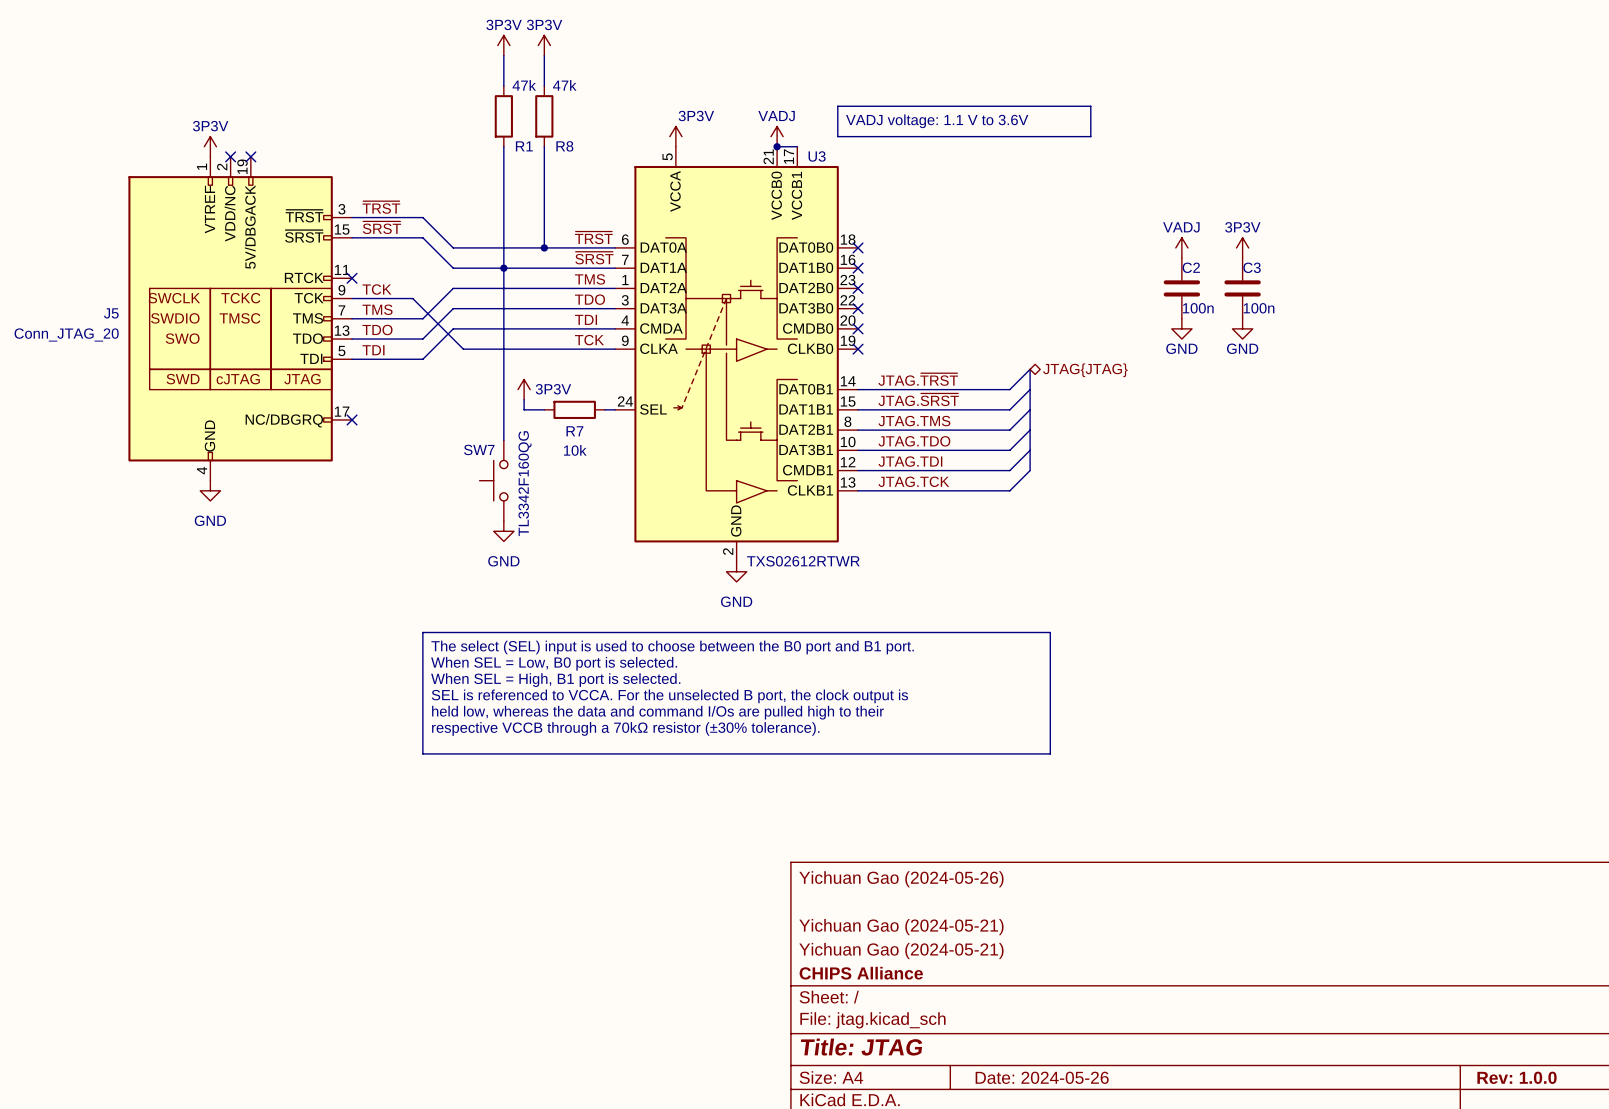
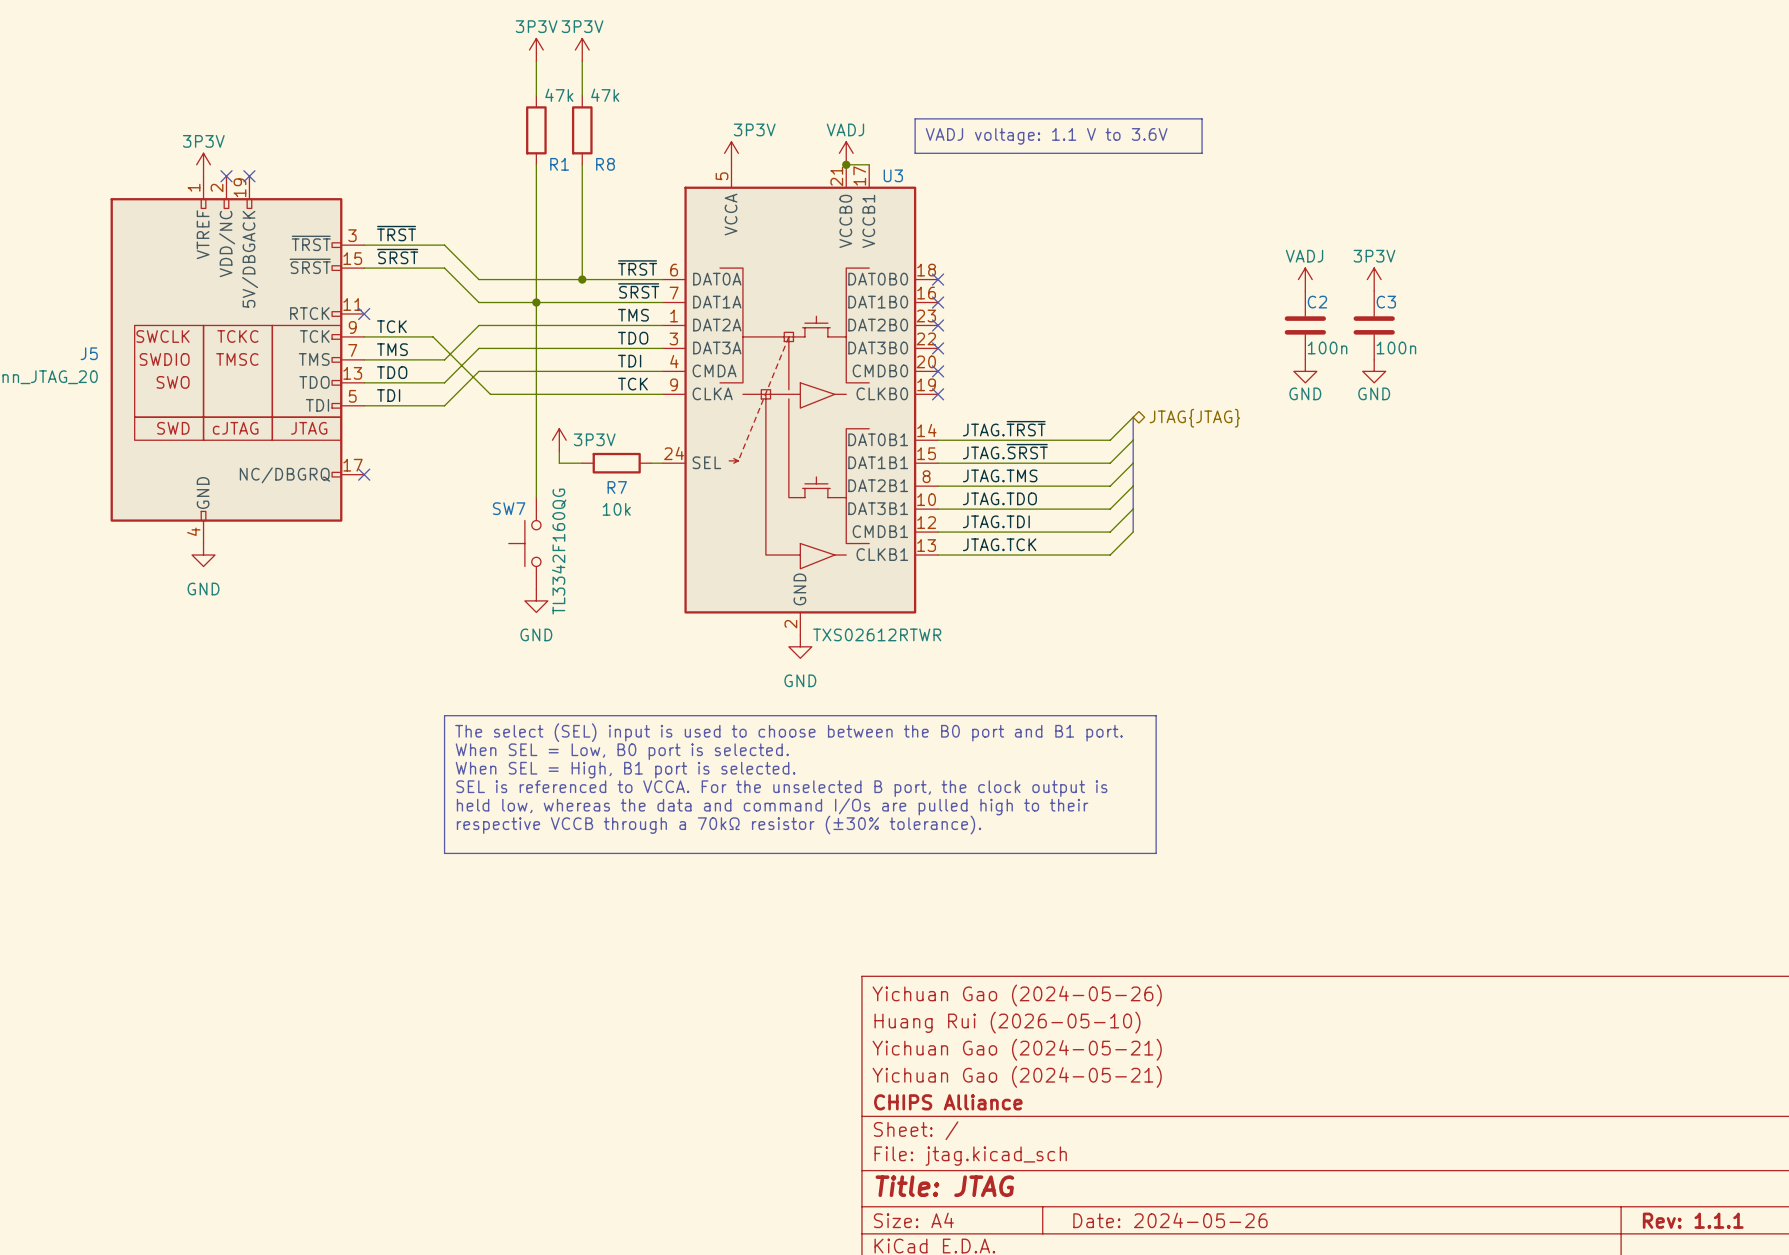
title block: none -> Huang Rui (2026-05-10) (1007, 1022)
title block: Rev: 1.0.0 (1517, 1077) -> Rev: 1.1.1 (1693, 1220)

